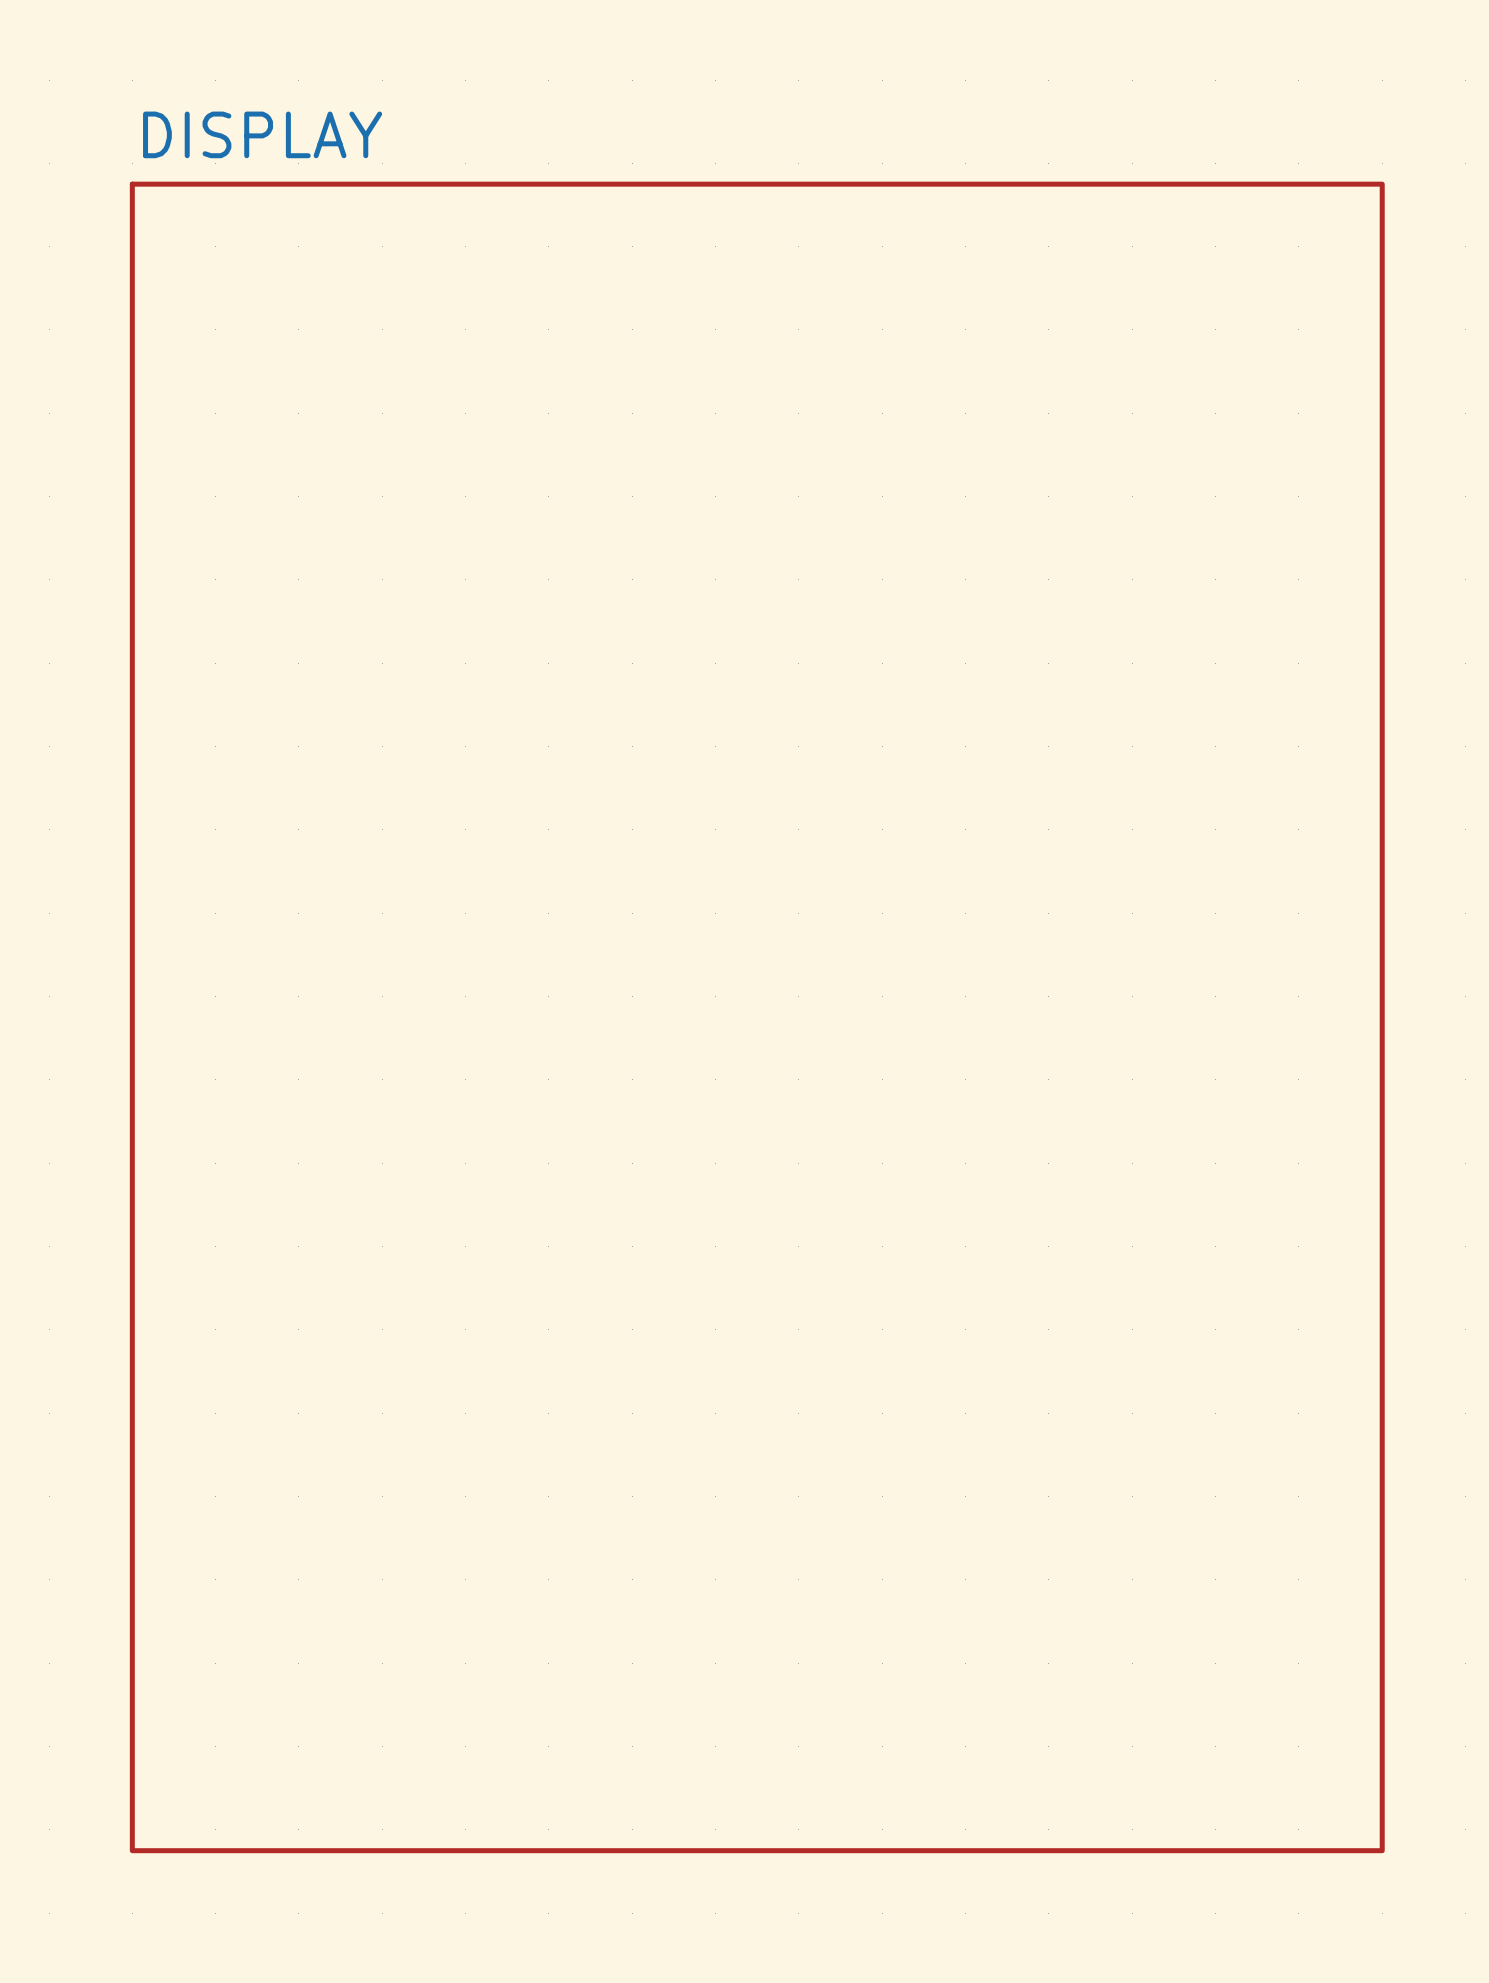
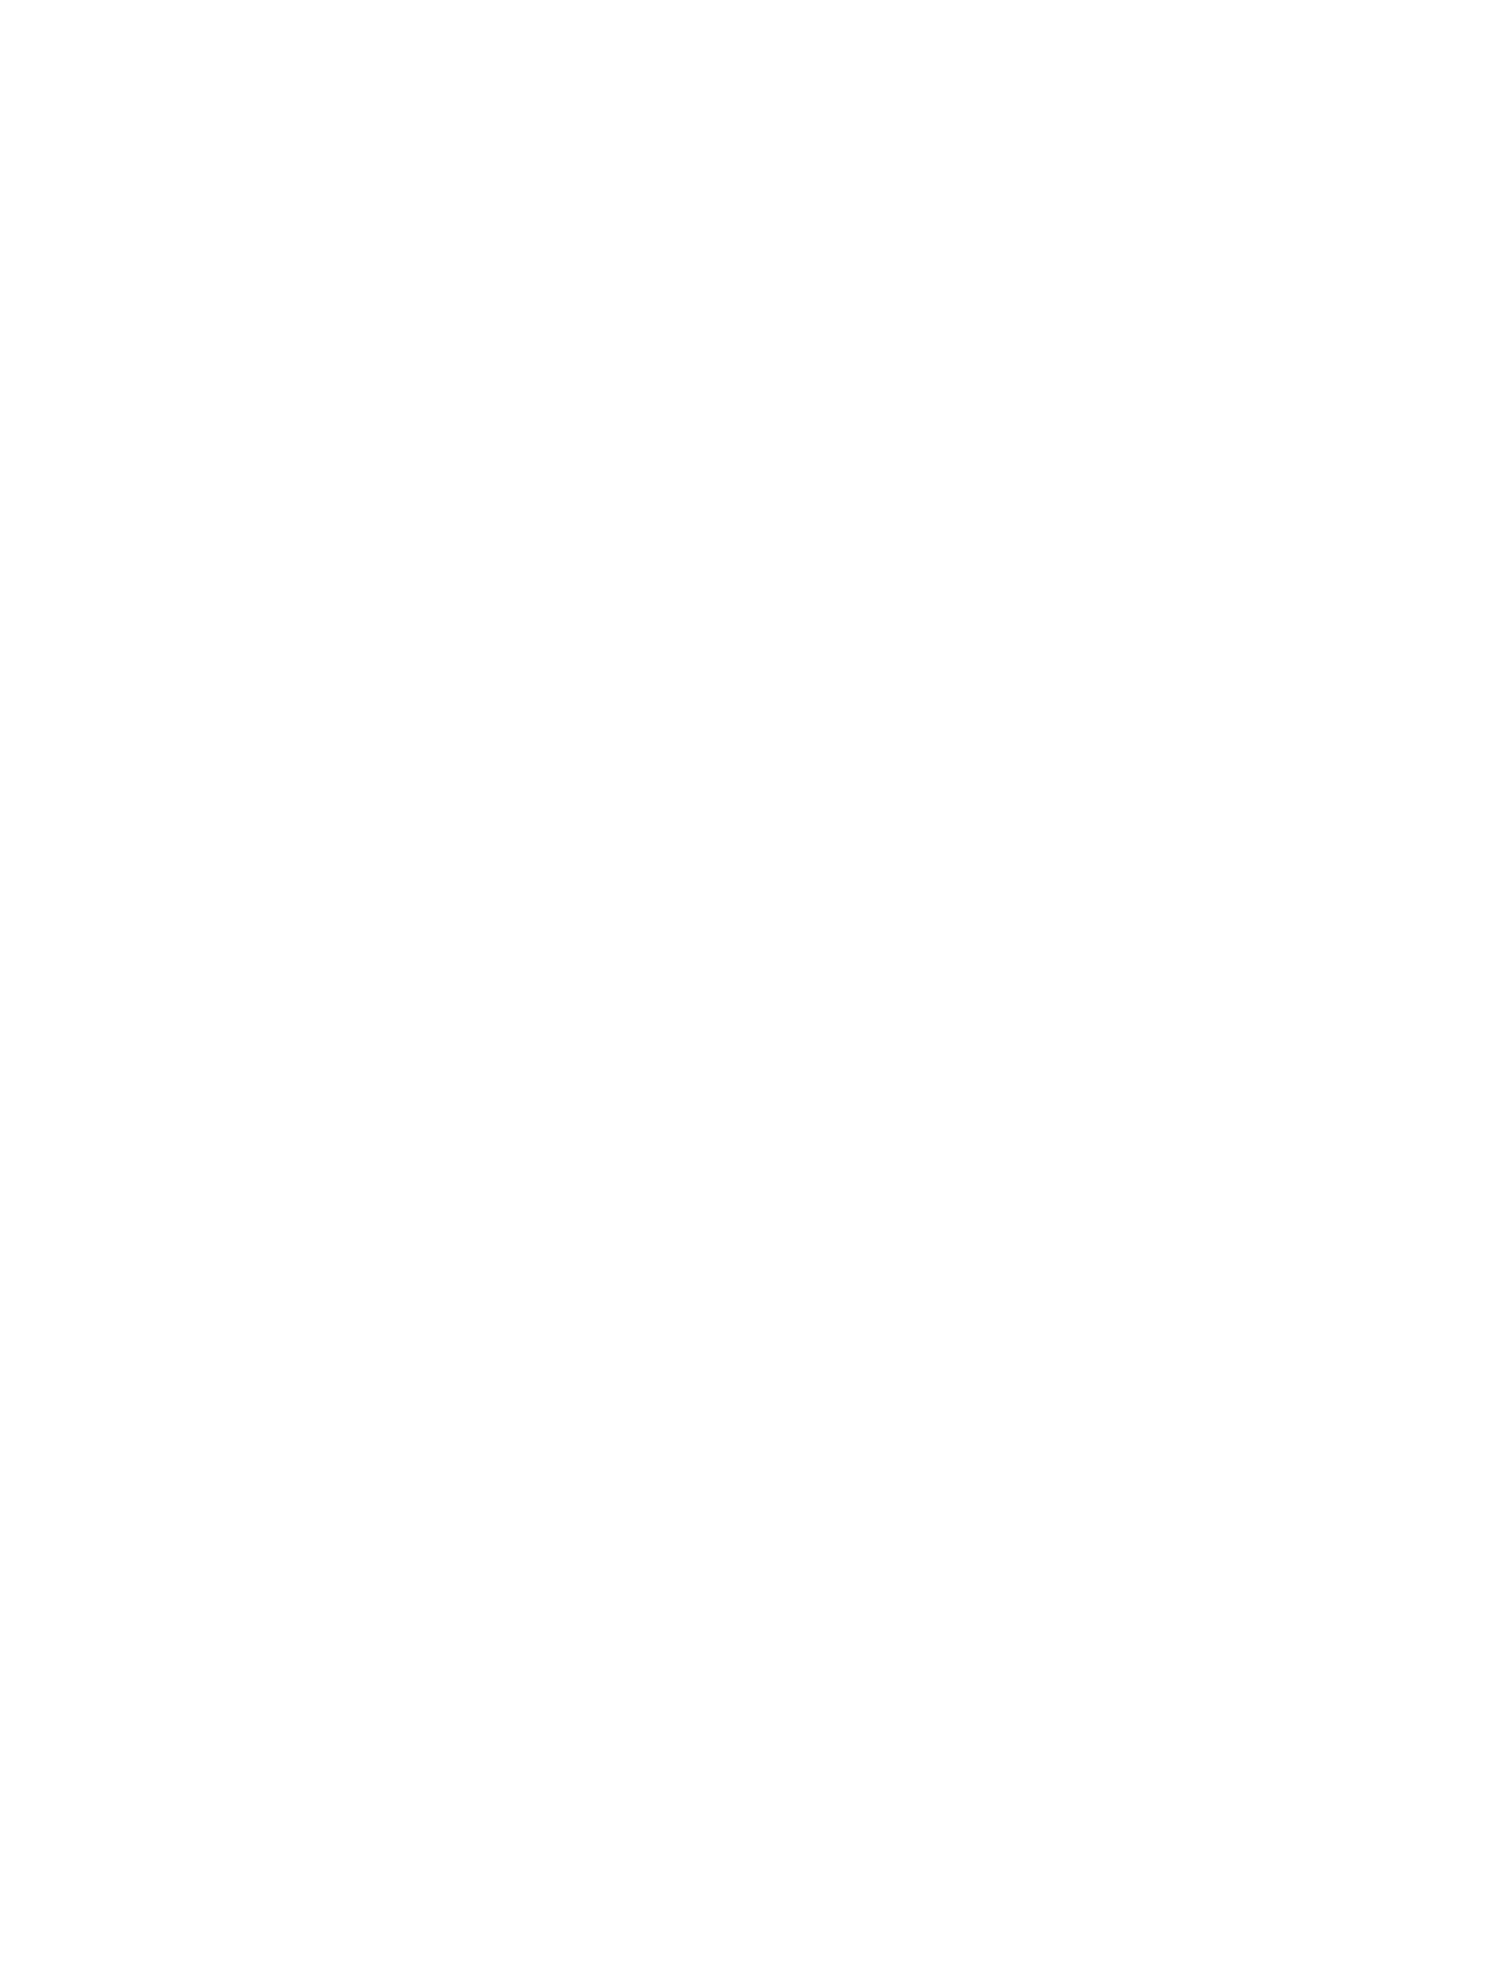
sheet DISPLAY: (757, 1017) -> none

